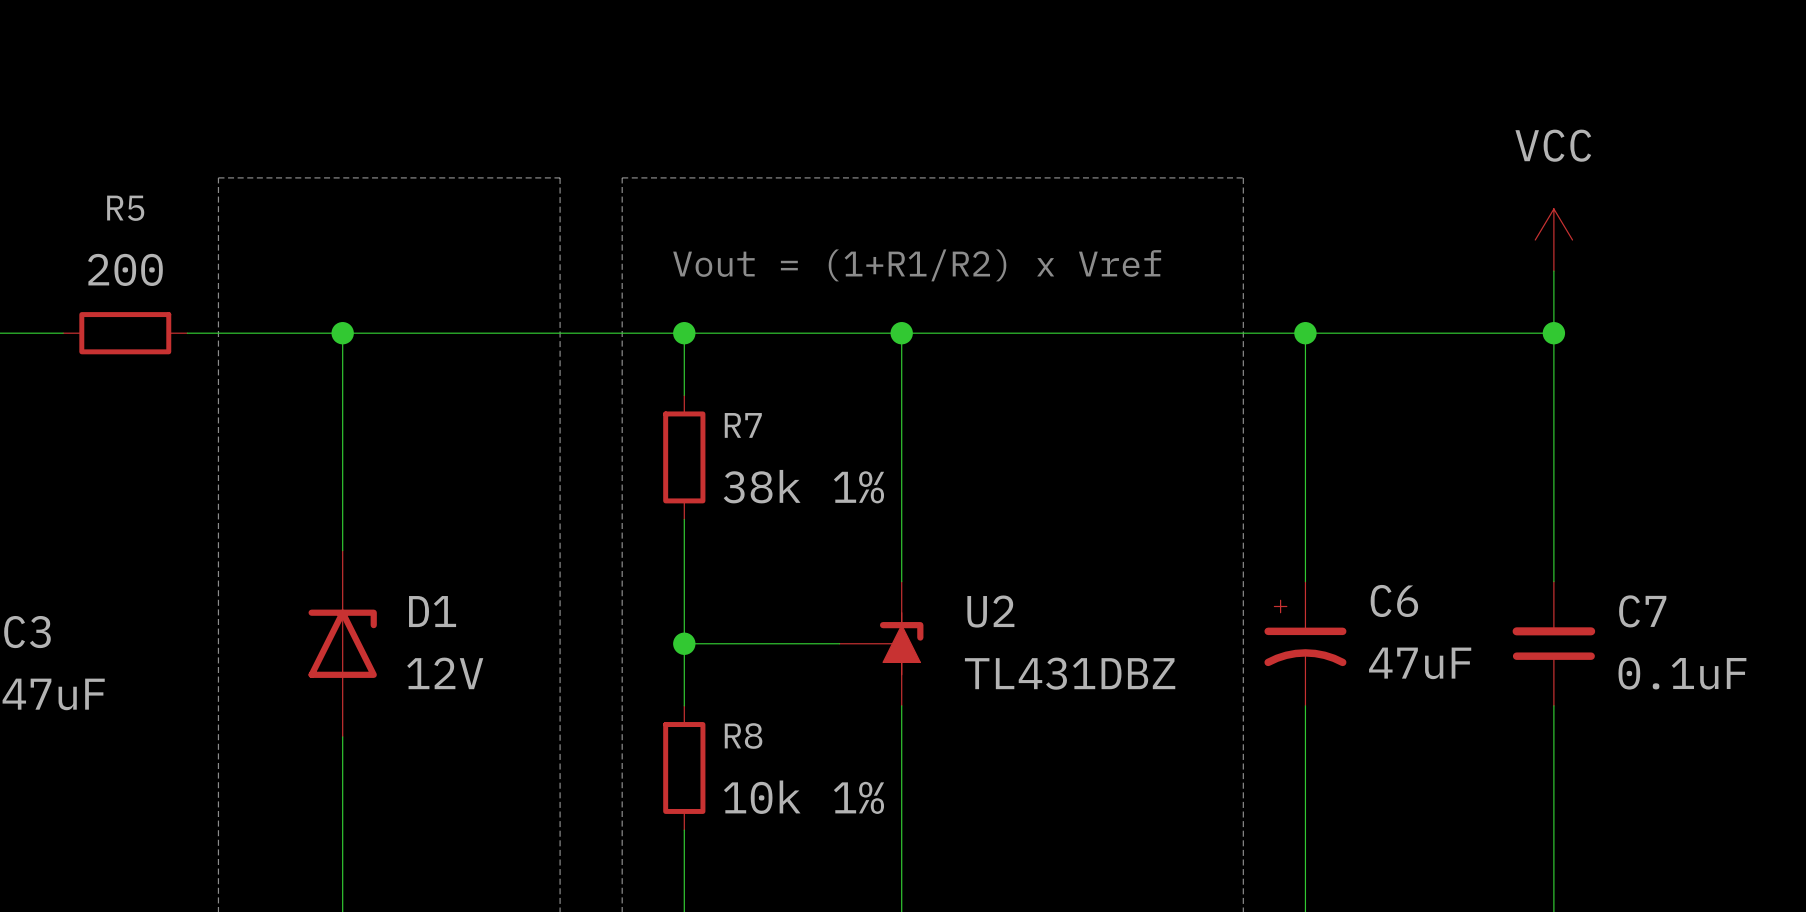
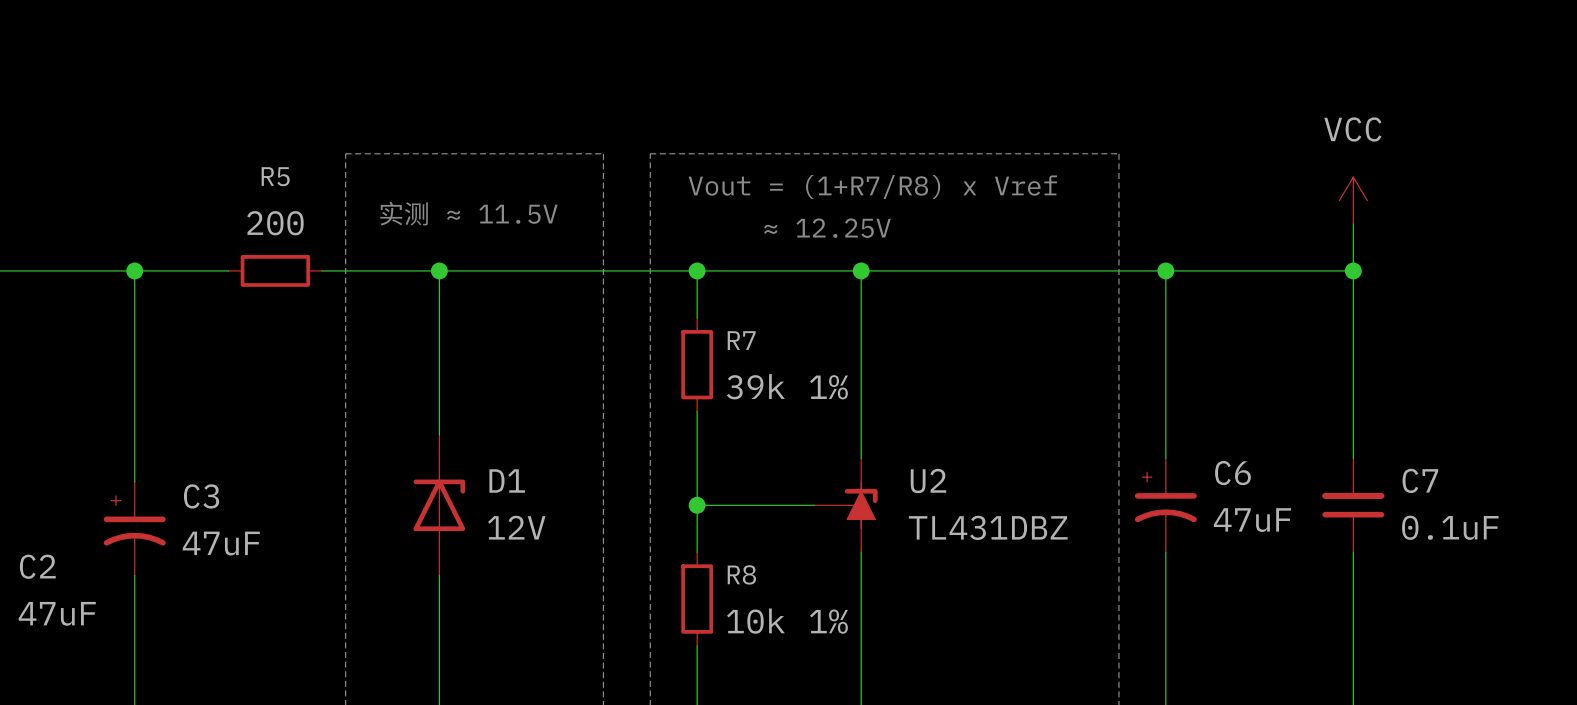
text: none -> 实测 ≈ 11.5V (468, 213)
text: Vout = (1+R1/R2) x Vref (917, 265) -> Vout = (1+R7/R8) x Vref (872, 186)
text: none -> ≈ 12.25V (827, 228)
R7 value: 38k (762, 486) -> 39k (755, 386)

